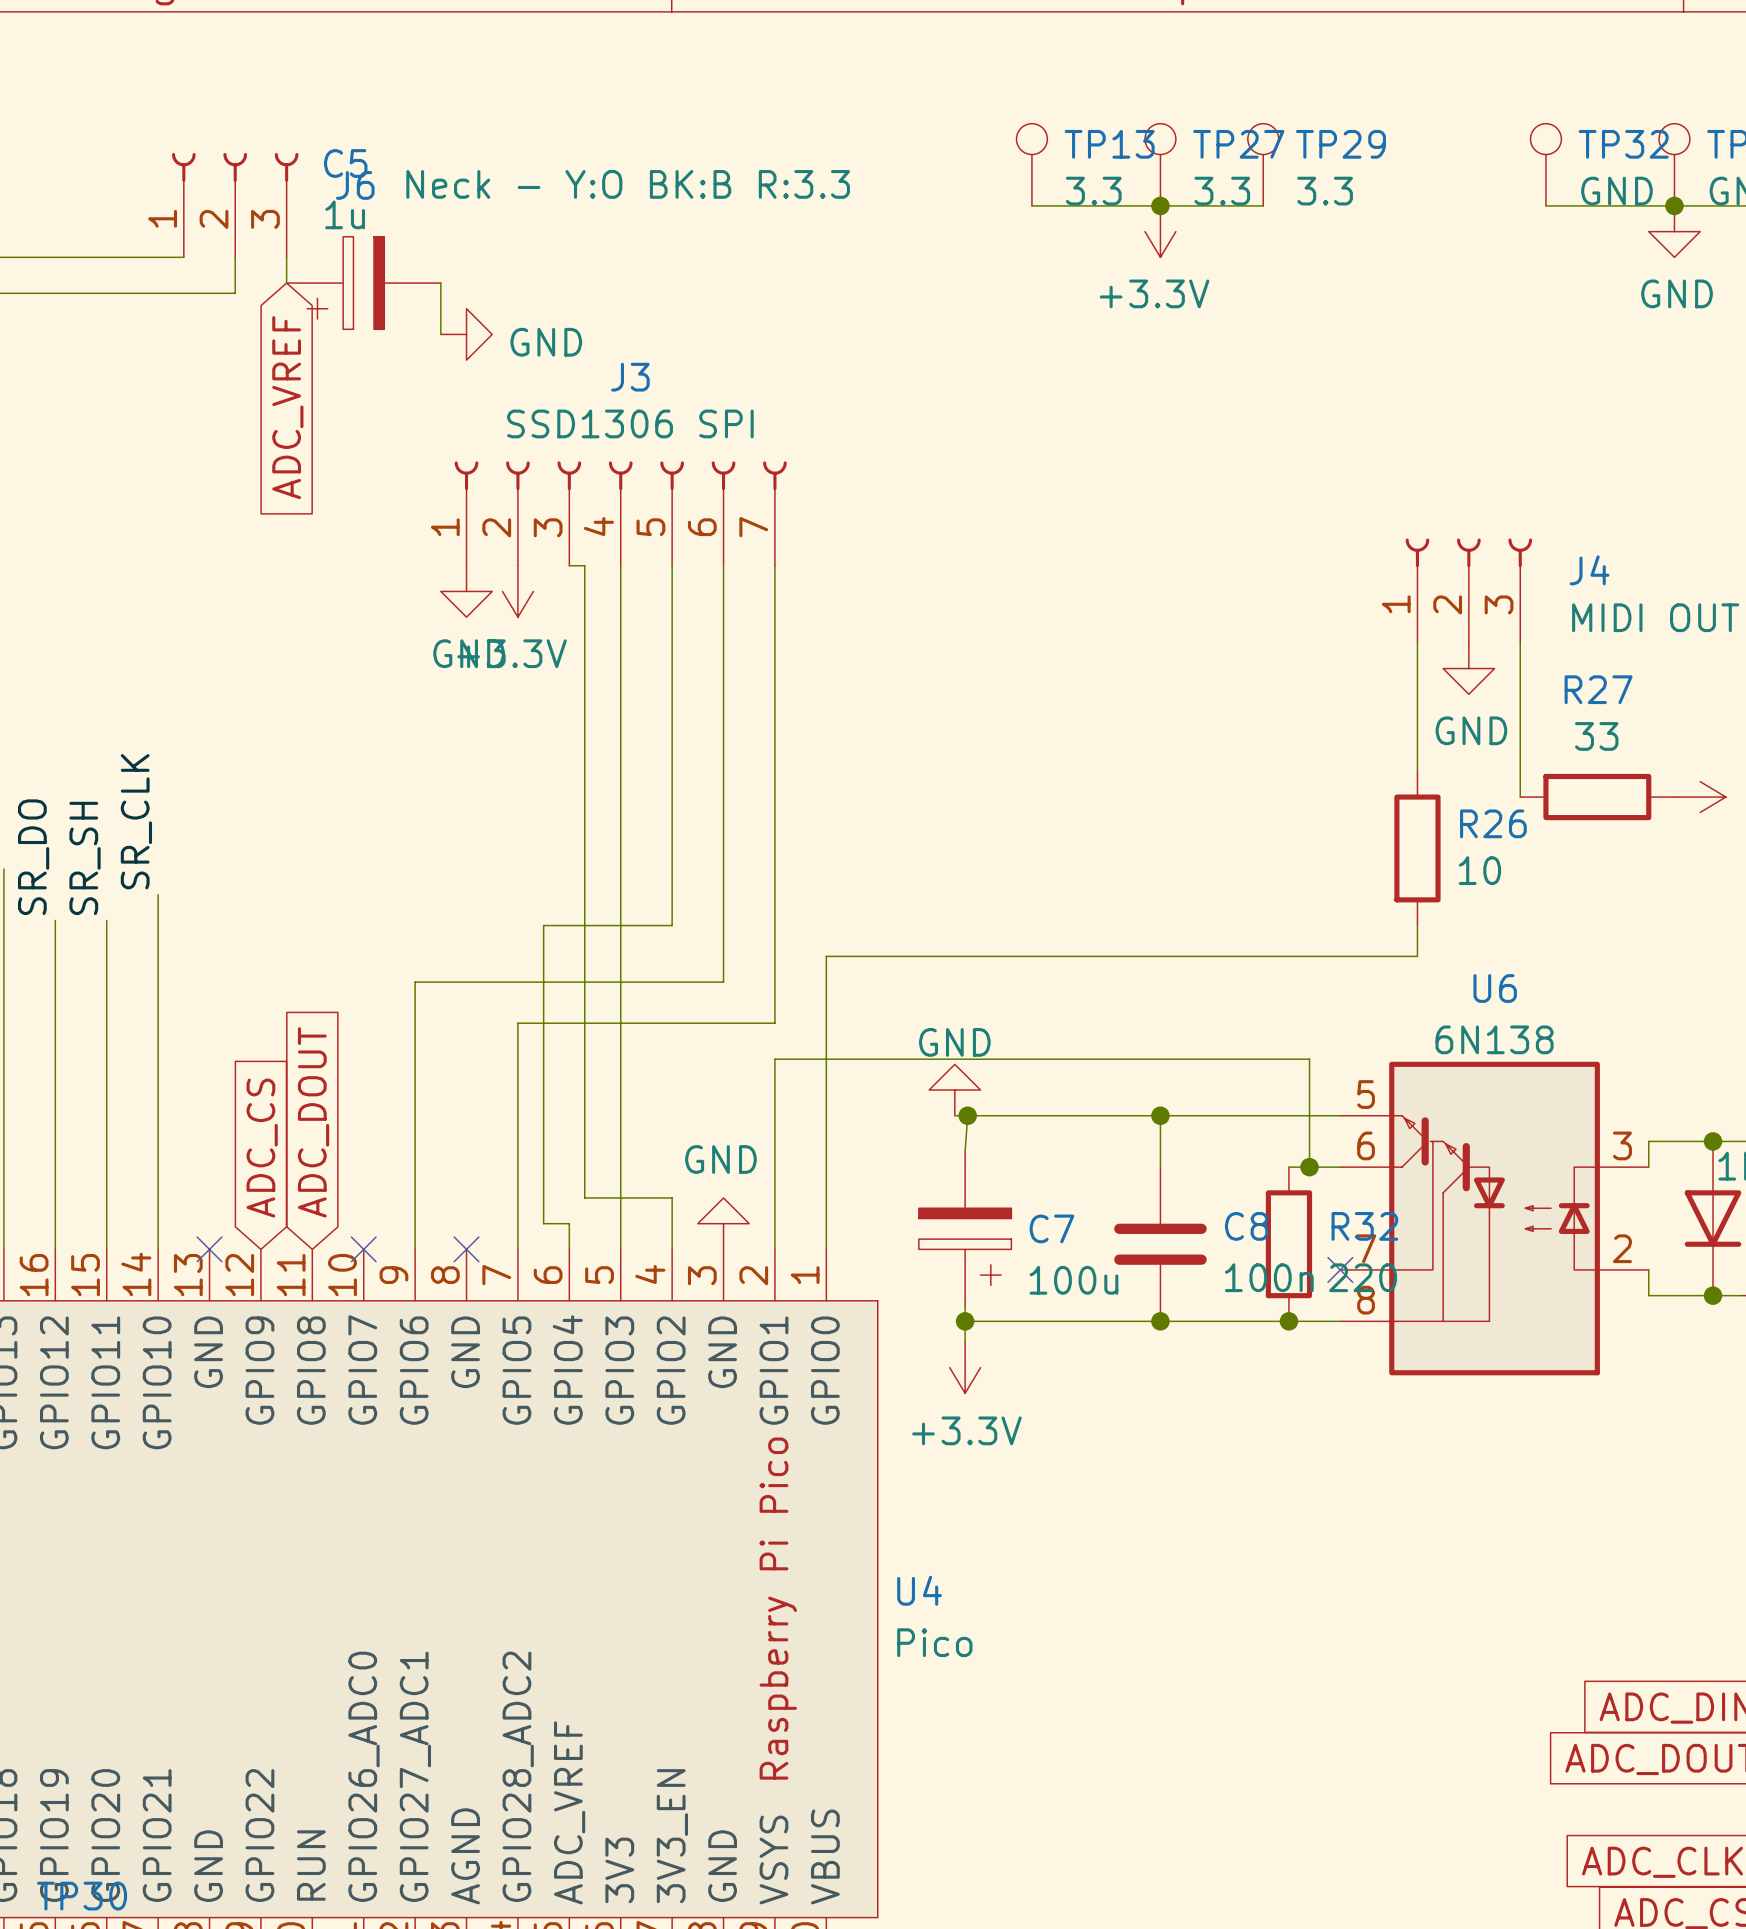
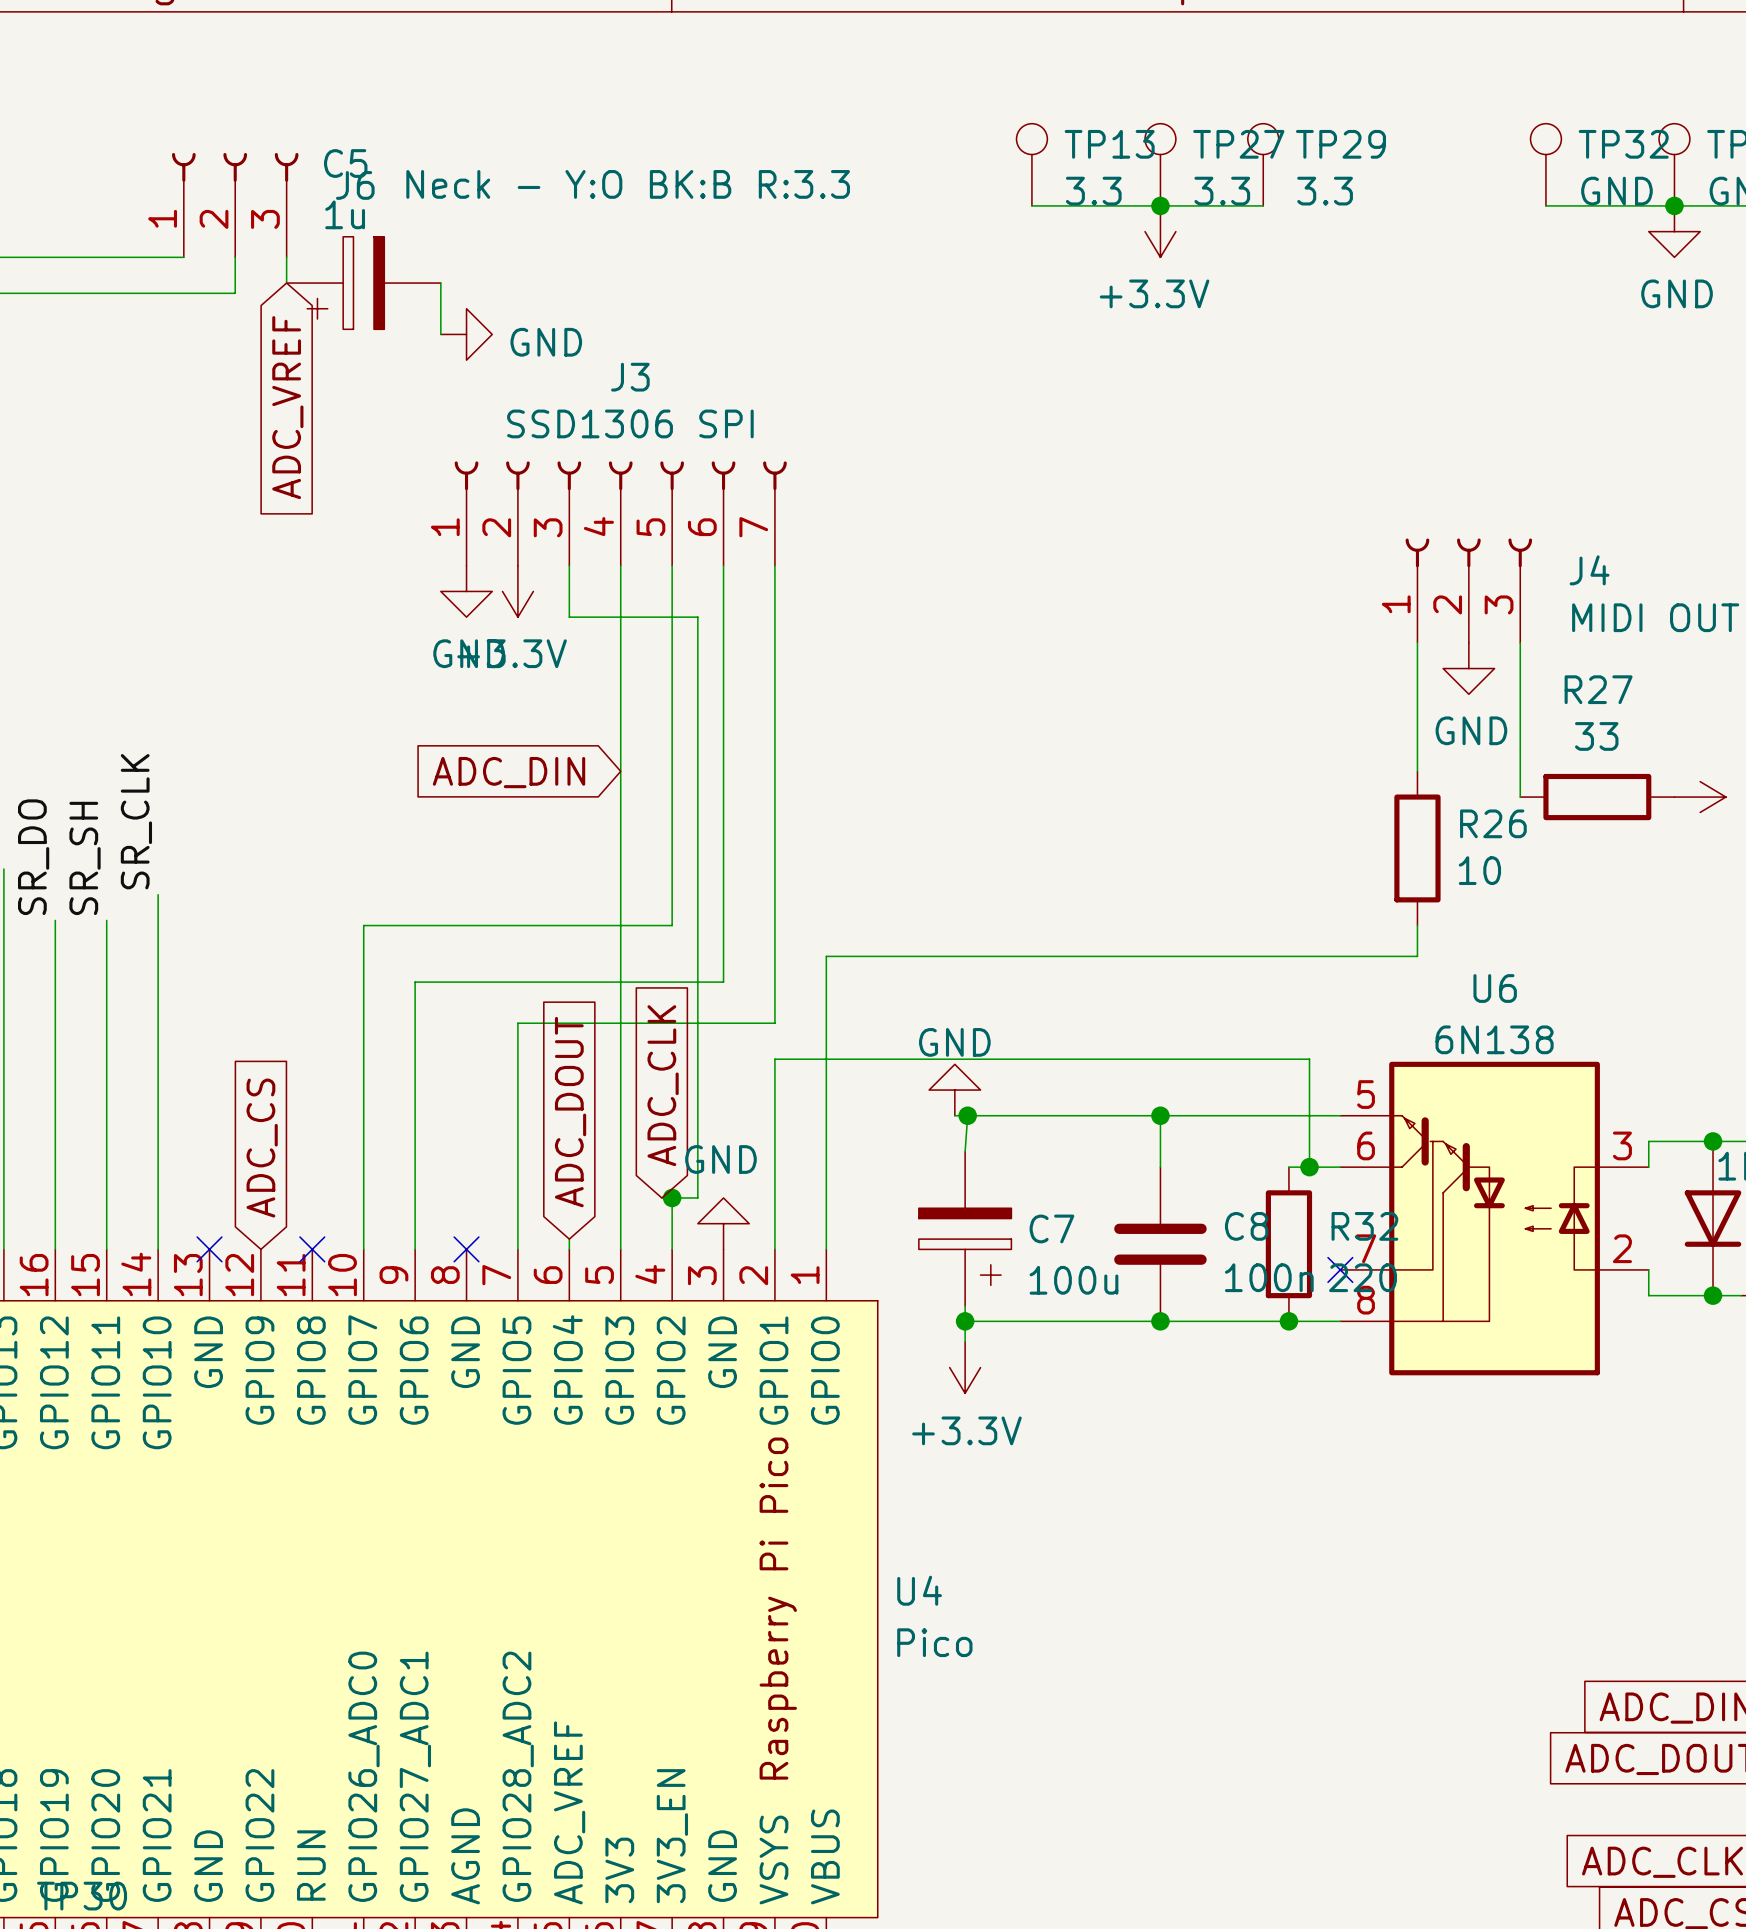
wire: (569, 565) (584, 565) (584, 1197) (661, 1197) -> (569, 565) (569, 617) (697, 617) (697, 1197) (672, 1197)
global label: none -> ADC_DIN (509, 772)
wire: (543, 925) (543, 1223) (569, 1223) (569, 1239) -> (543, 925) (363, 925) (363, 1249)
global label: none -> ADC_CLK (663, 1085)
global label position: ADC_DOUT (313, 1122) -> ADC_DOUT (570, 1112)
junction: none -> (672, 1197)
no-connect mark position: (363, 1249) -> (312, 1249)

